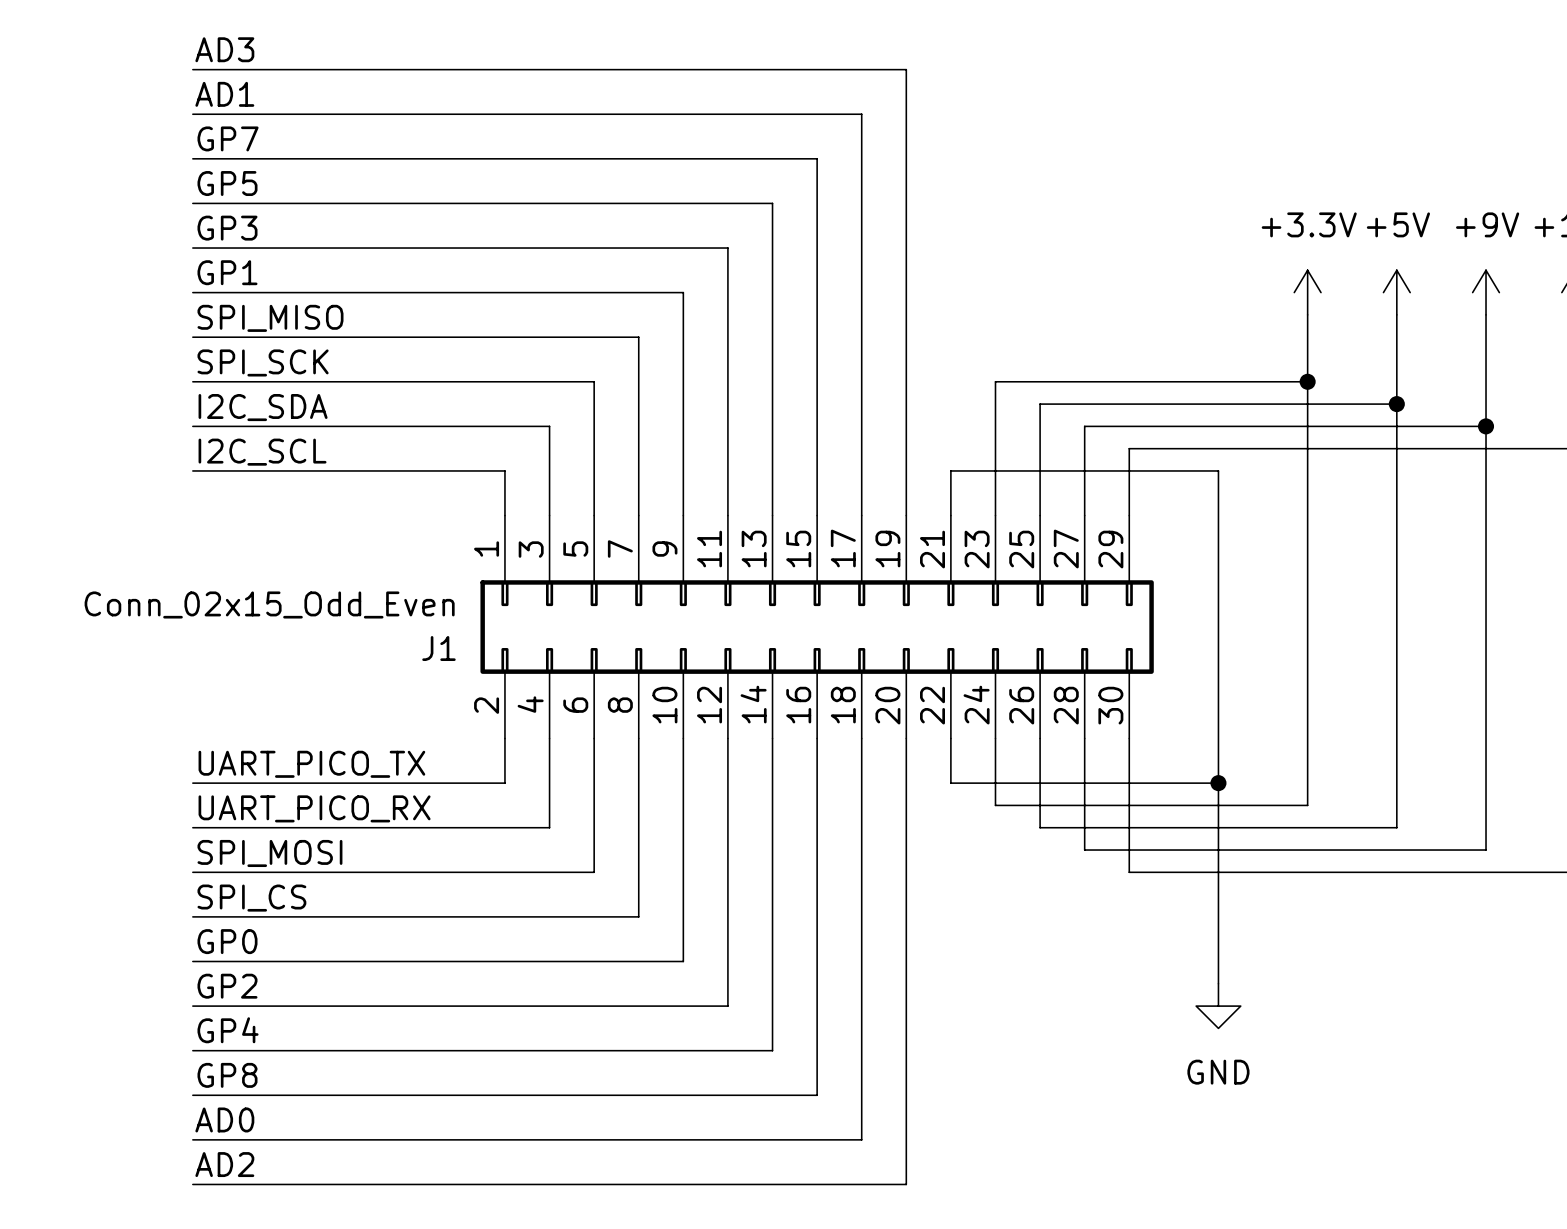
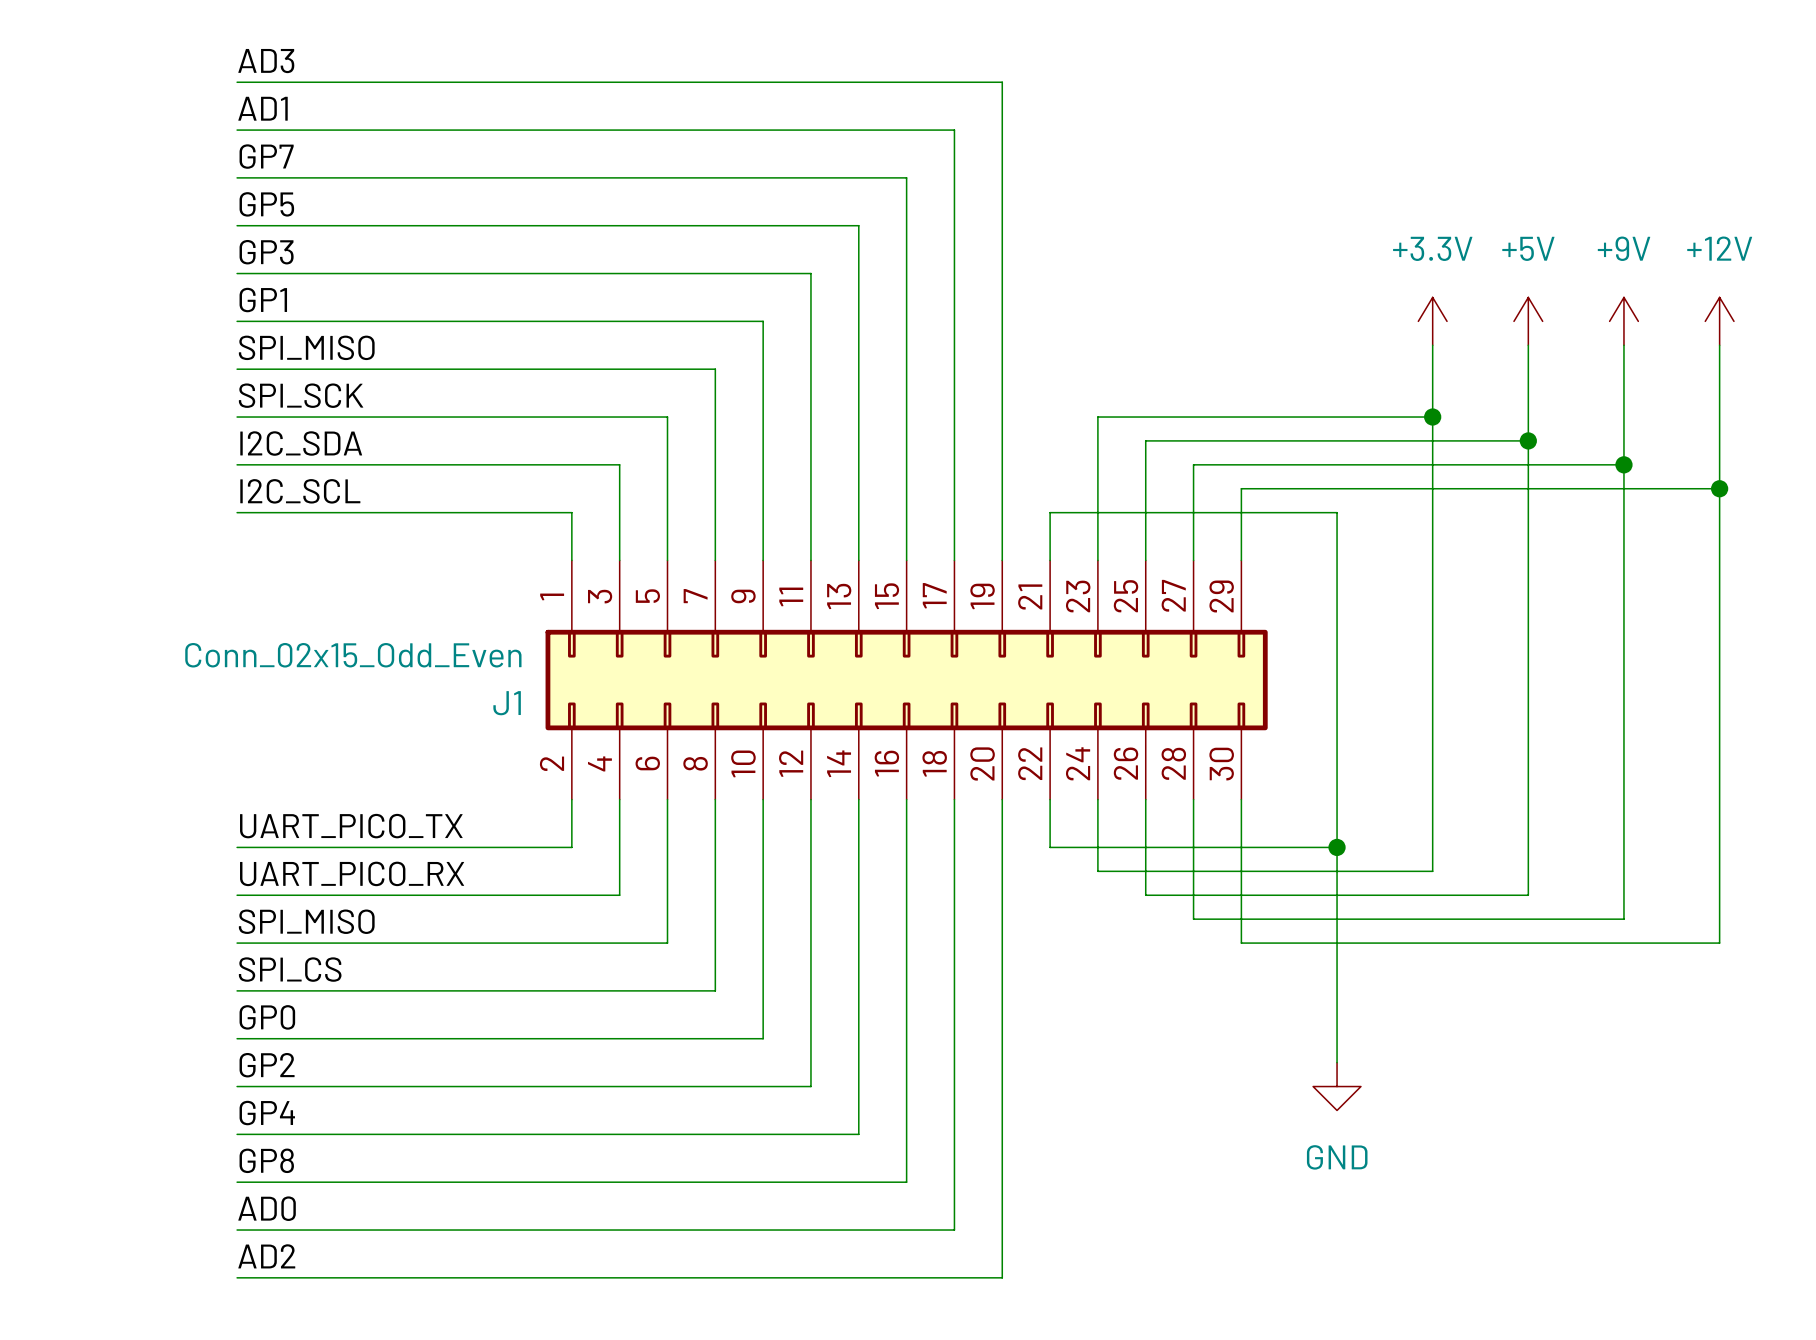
label: SPI_MOSI (269, 853) -> SPI_MISO (306, 921)

